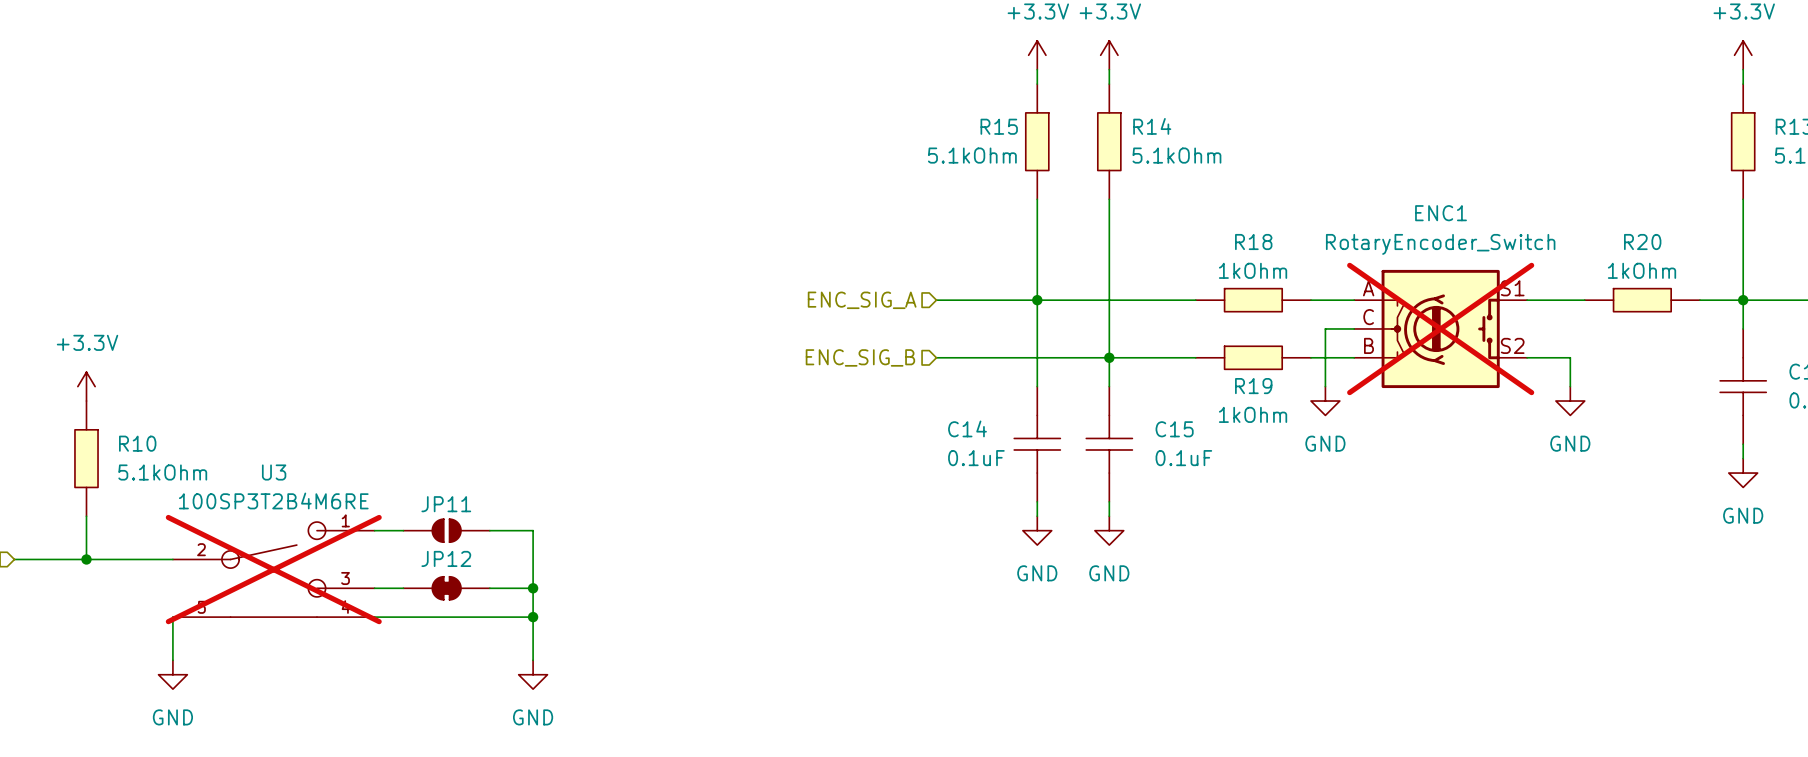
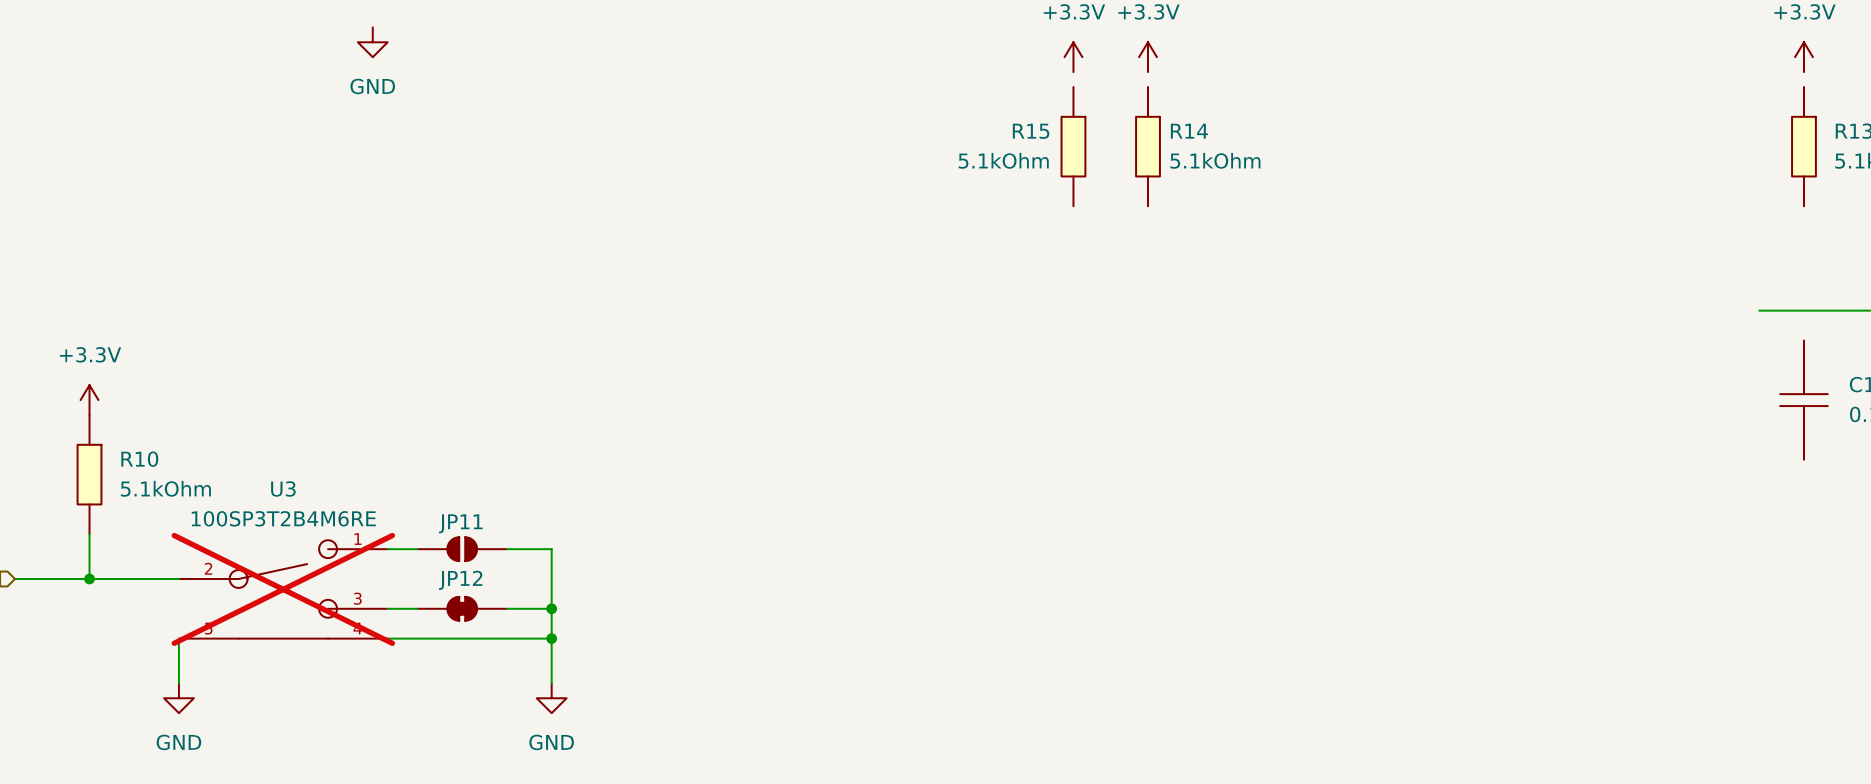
power symbol: none -> GND (372, 42)
wire: (1037, 69) (1037, 84) -> none
wire: (1109, 69) (1109, 84) -> none
wire: (1743, 69) (1743, 84) -> none
wire: (1037, 199) (1037, 386) -> none
wire: (1109, 199) (1109, 386) -> none
wire: (1743, 199) (1743, 328) -> none
hierarchical label: ENC_SIG_A (862, 300) -> none
wire: (936, 300) (1195, 300) -> none
junction: (1037, 300) -> none
R18: 1kOhm (1253, 300) -> none
wire: (1311, 300) (1354, 300) -> none
wire: (1527, 300) (1584, 300) -> none
R20: 1kOhm (1642, 300) -> none
junction: (1743, 300) -> none
wire: (1354, 328) (1325, 328) (1325, 386) -> none
ENC1: RotaryEncoder_Switch (1440, 328) -> none
hierarchical label: ENC_SIG_B (860, 357) -> none
wire: (936, 357) (1195, 357) -> none
junction: (1109, 357) -> none
R19: 1kOhm (1253, 357) -> none
wire: (1311, 357) (1354, 357) -> none
wire: (1527, 357) (1570, 357) (1570, 386) -> none
power symbol: GND (1325, 401) -> none
power symbol: GND (1570, 401) -> none
C14: 0.1uF (1037, 444) -> none
C15: 0.1uF (1109, 444) -> none
wire: (1743, 444) (1743, 458) -> none
power symbol: GND (1743, 473) -> none
wire: (1037, 501) (1037, 516) -> none
wire: (1109, 501) (1109, 516) -> none
power symbol: GND (1037, 530) -> none
power symbol: GND (1109, 530) -> none

